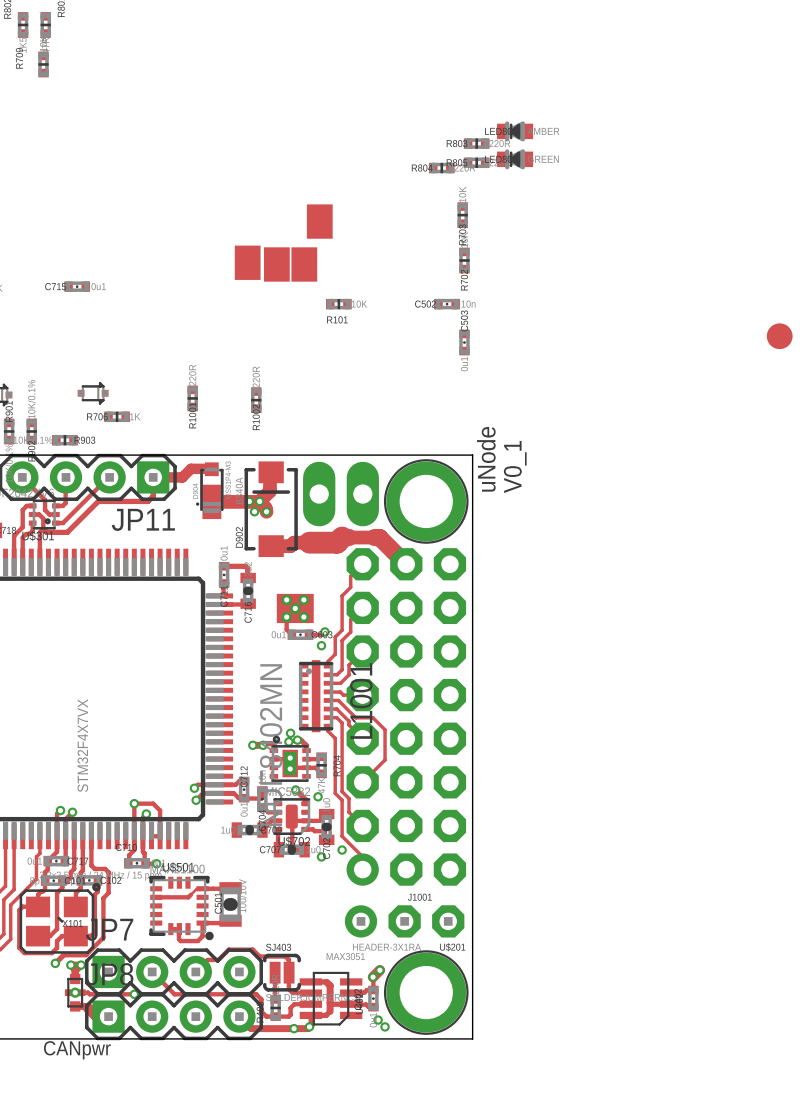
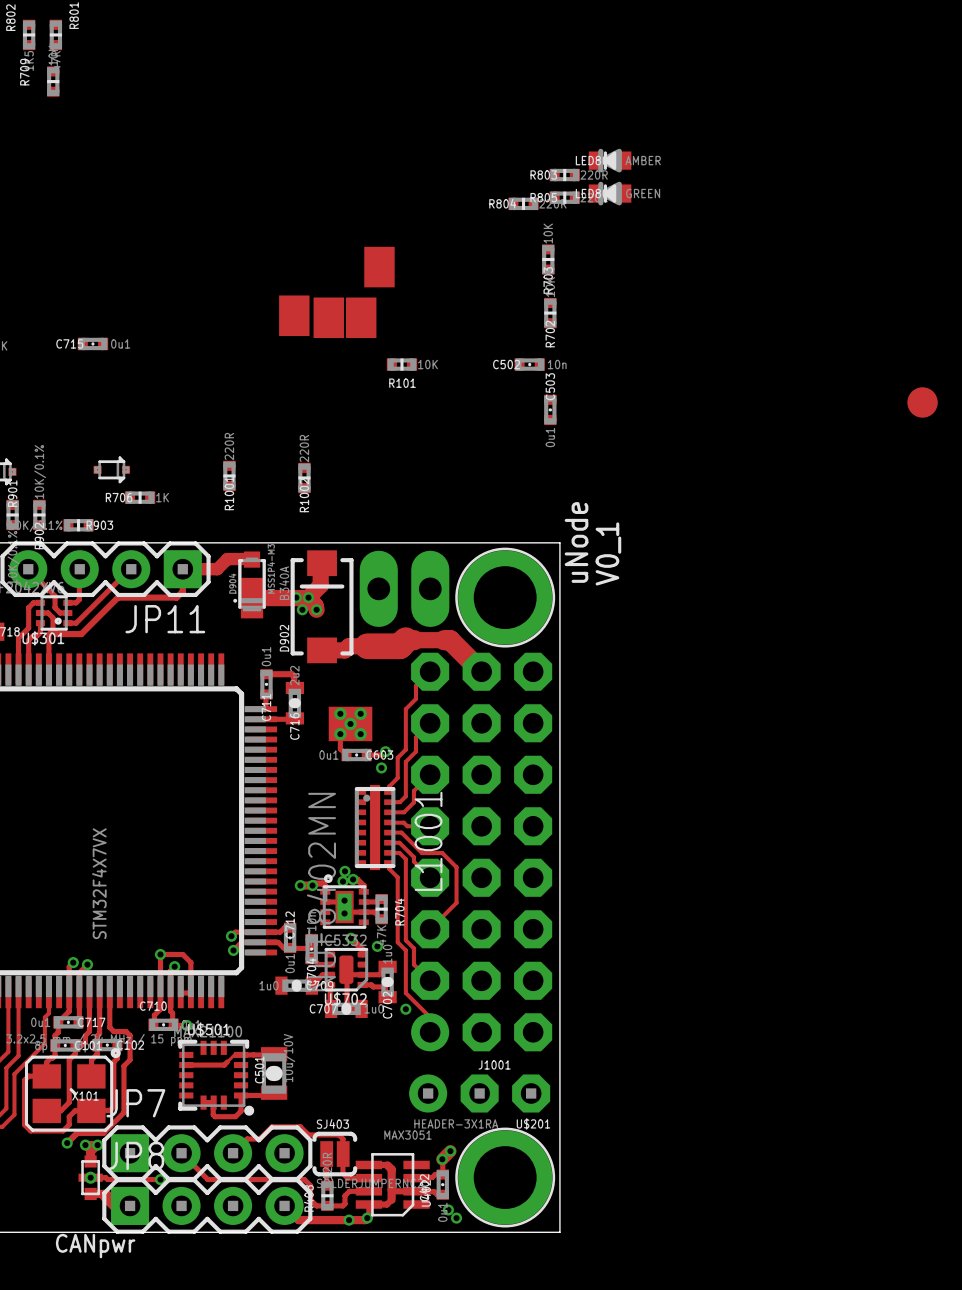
via: (321, 856) -> none

